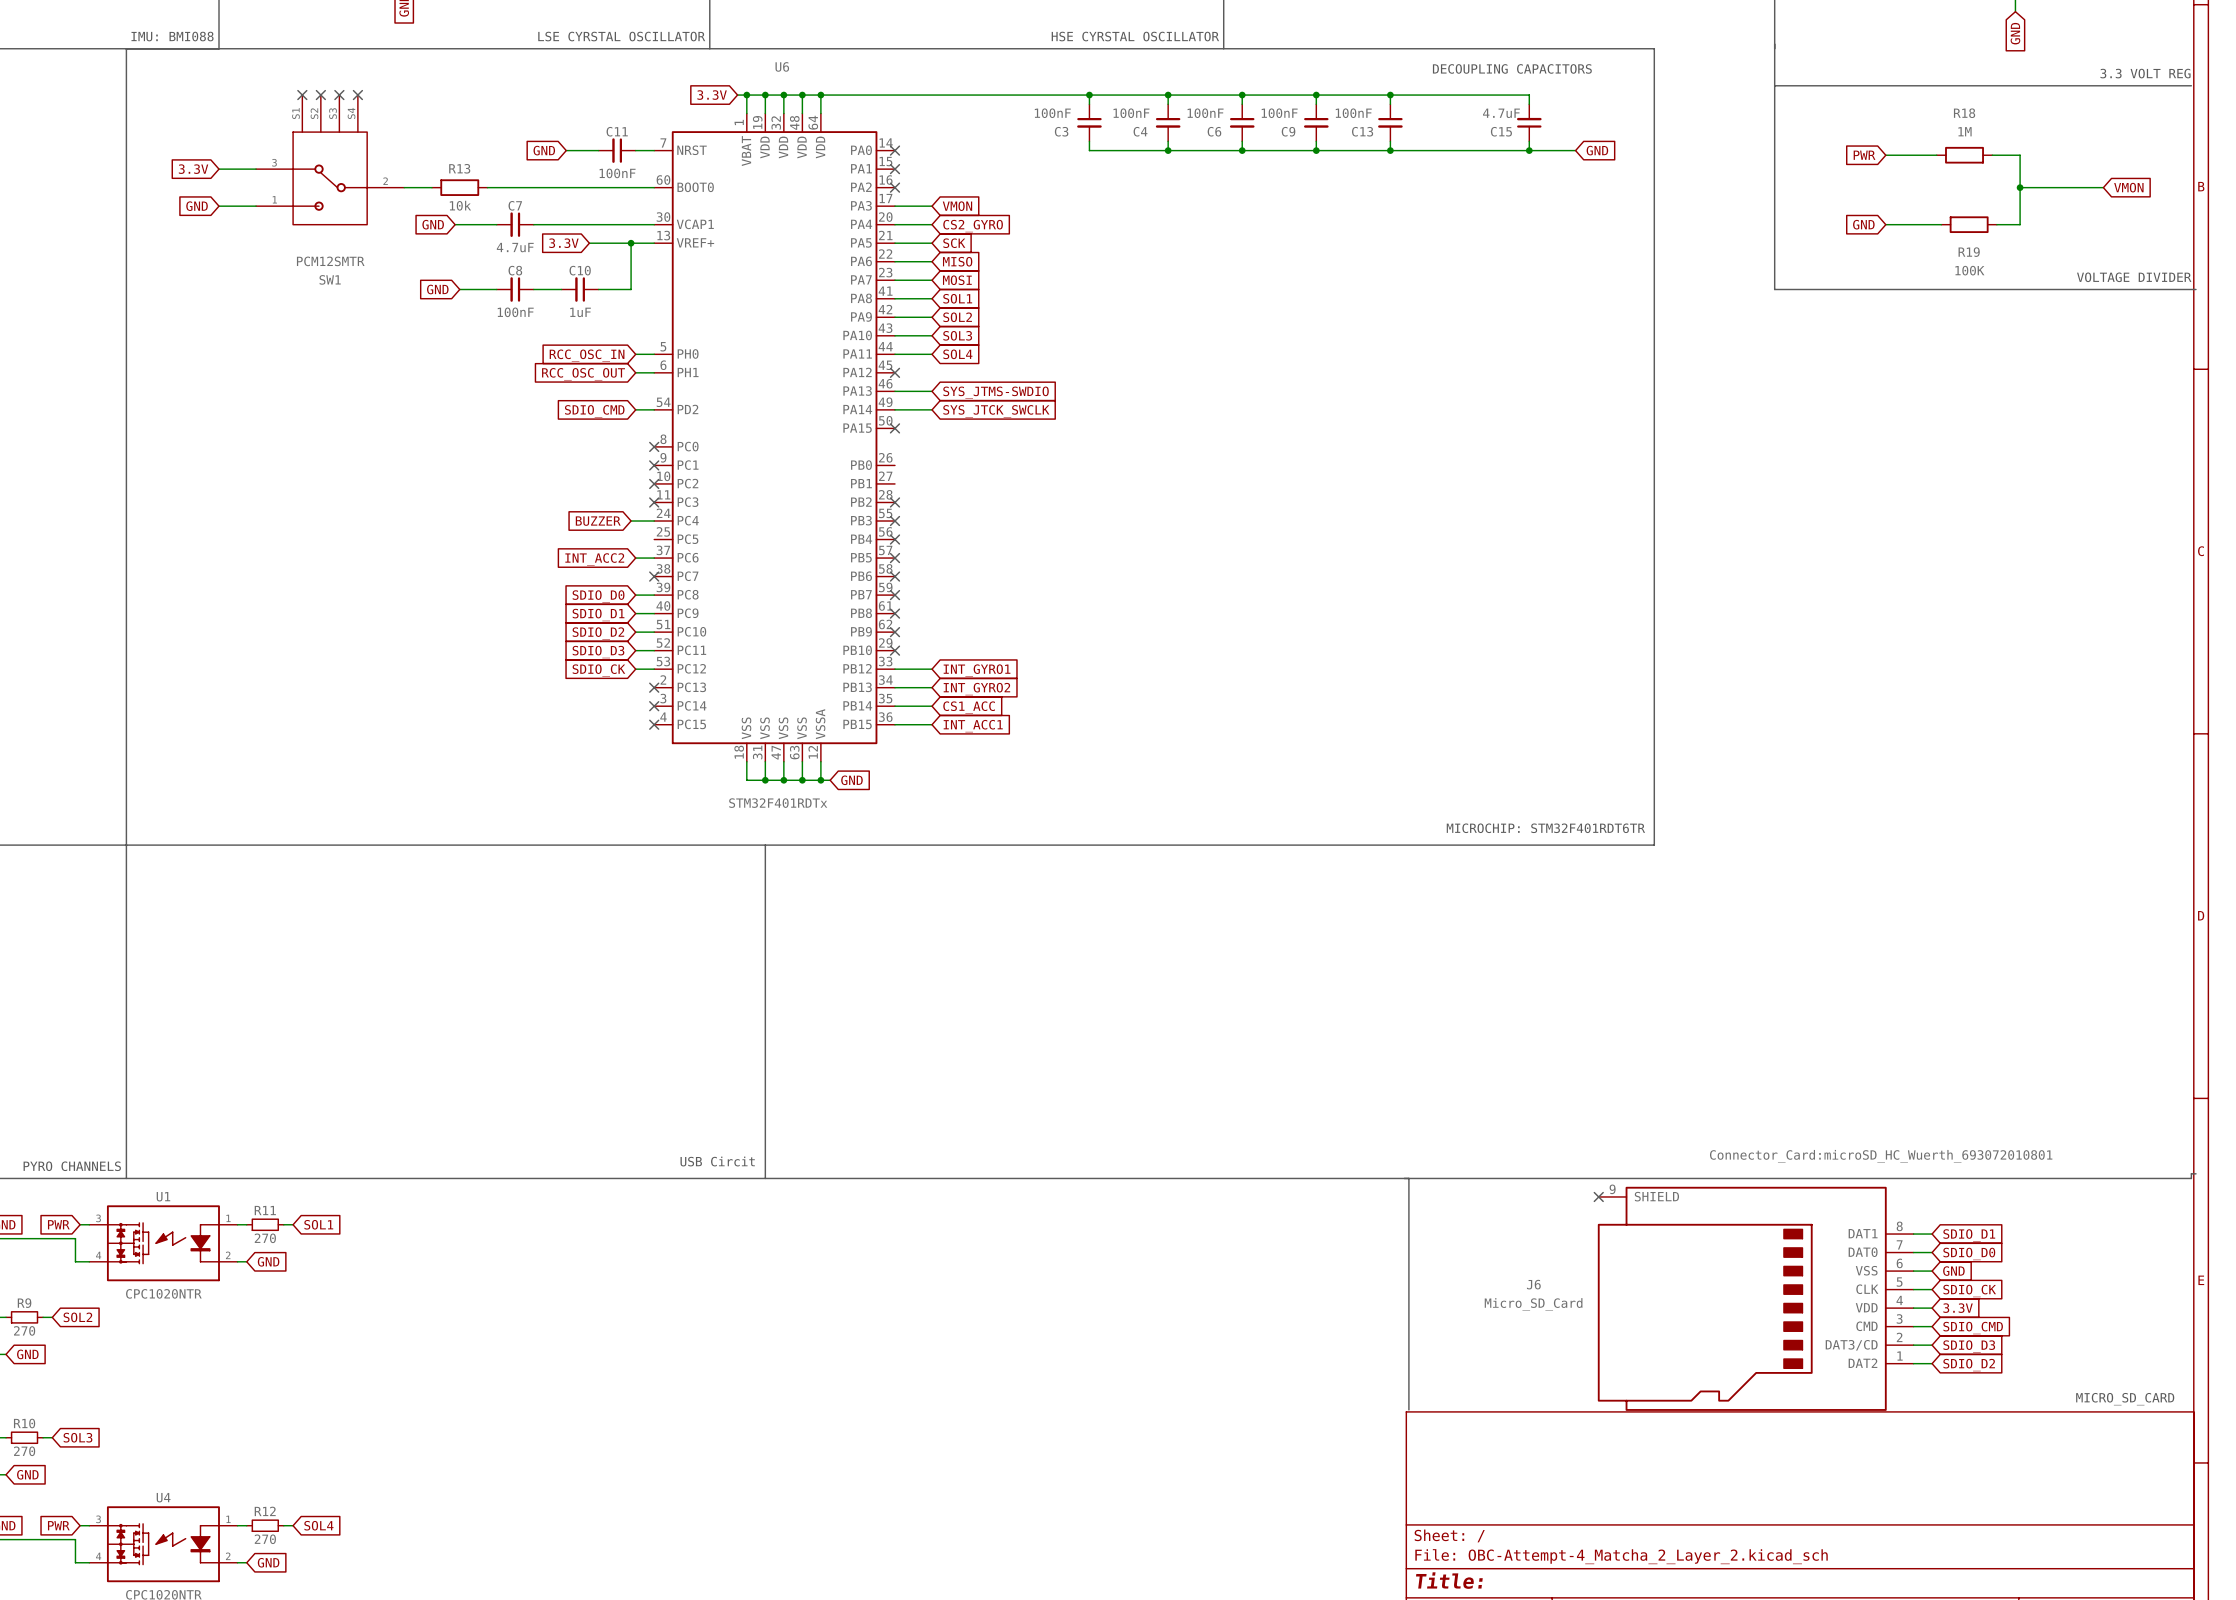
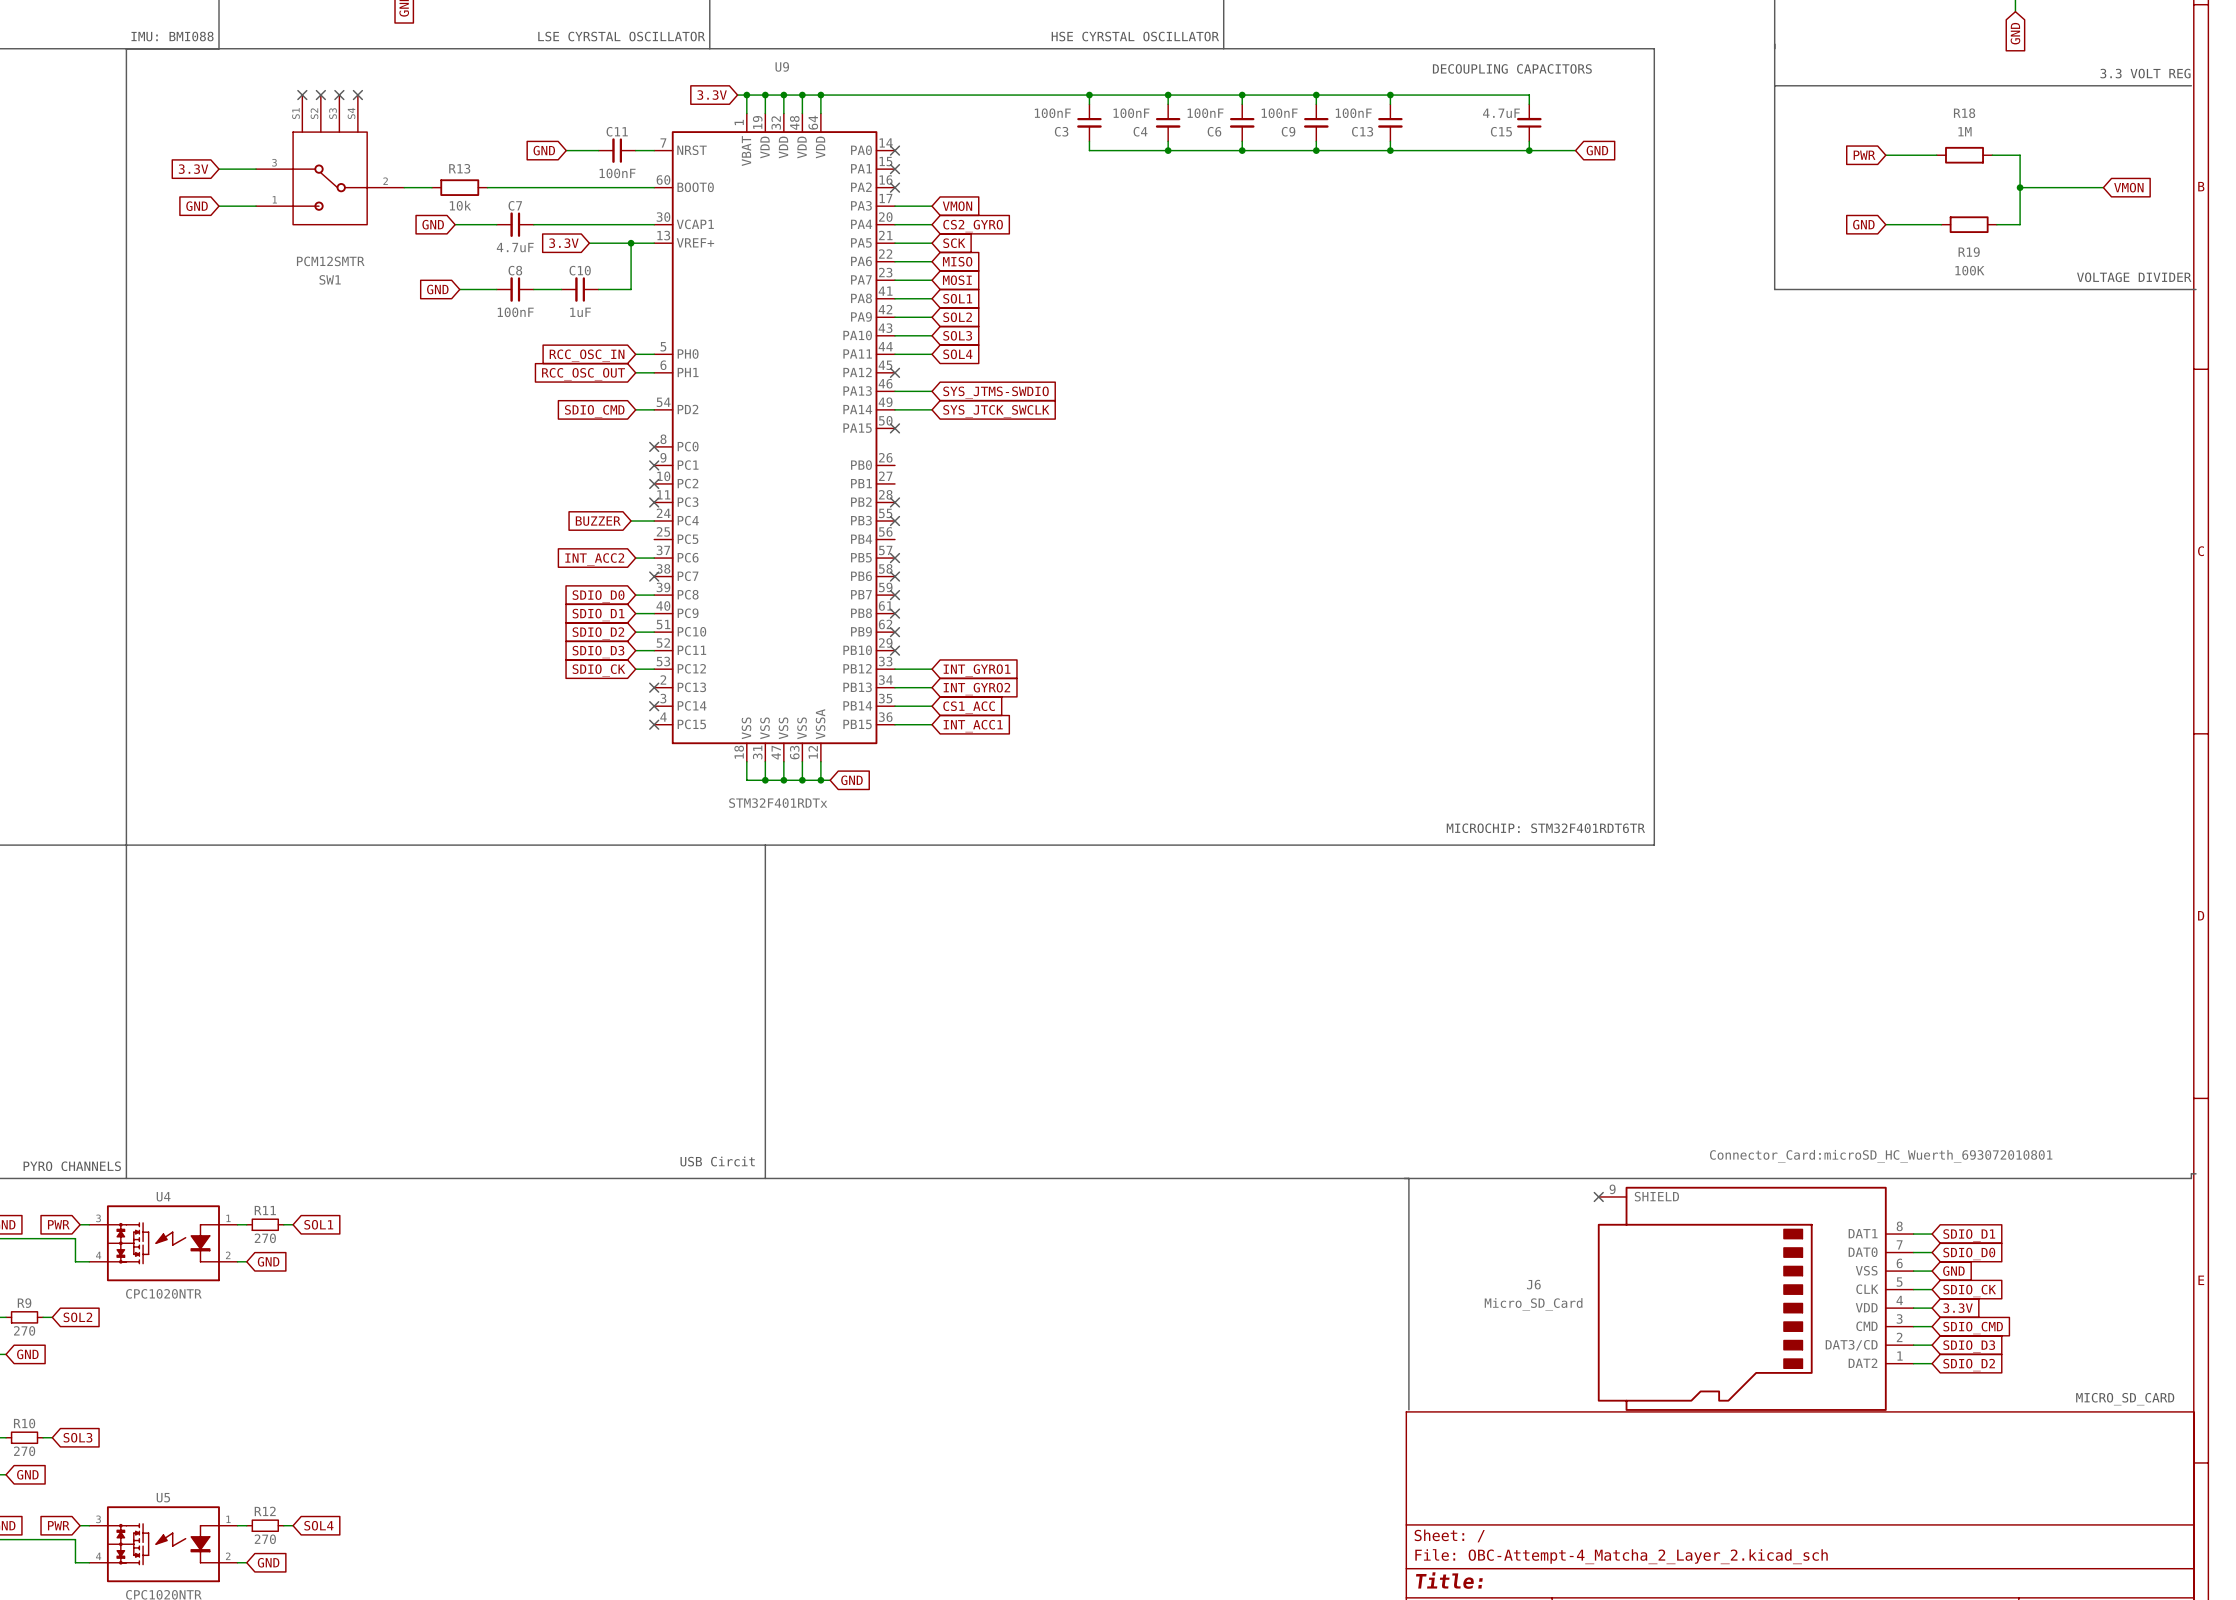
U6 name: U6 (782, 66) -> U9 (782, 66)
no-connect mark: (894, 539) -> none
U1 name: U1 (163, 1196) -> U4 (163, 1196)
U4 name: U4 (163, 1497) -> U5 (163, 1497)

